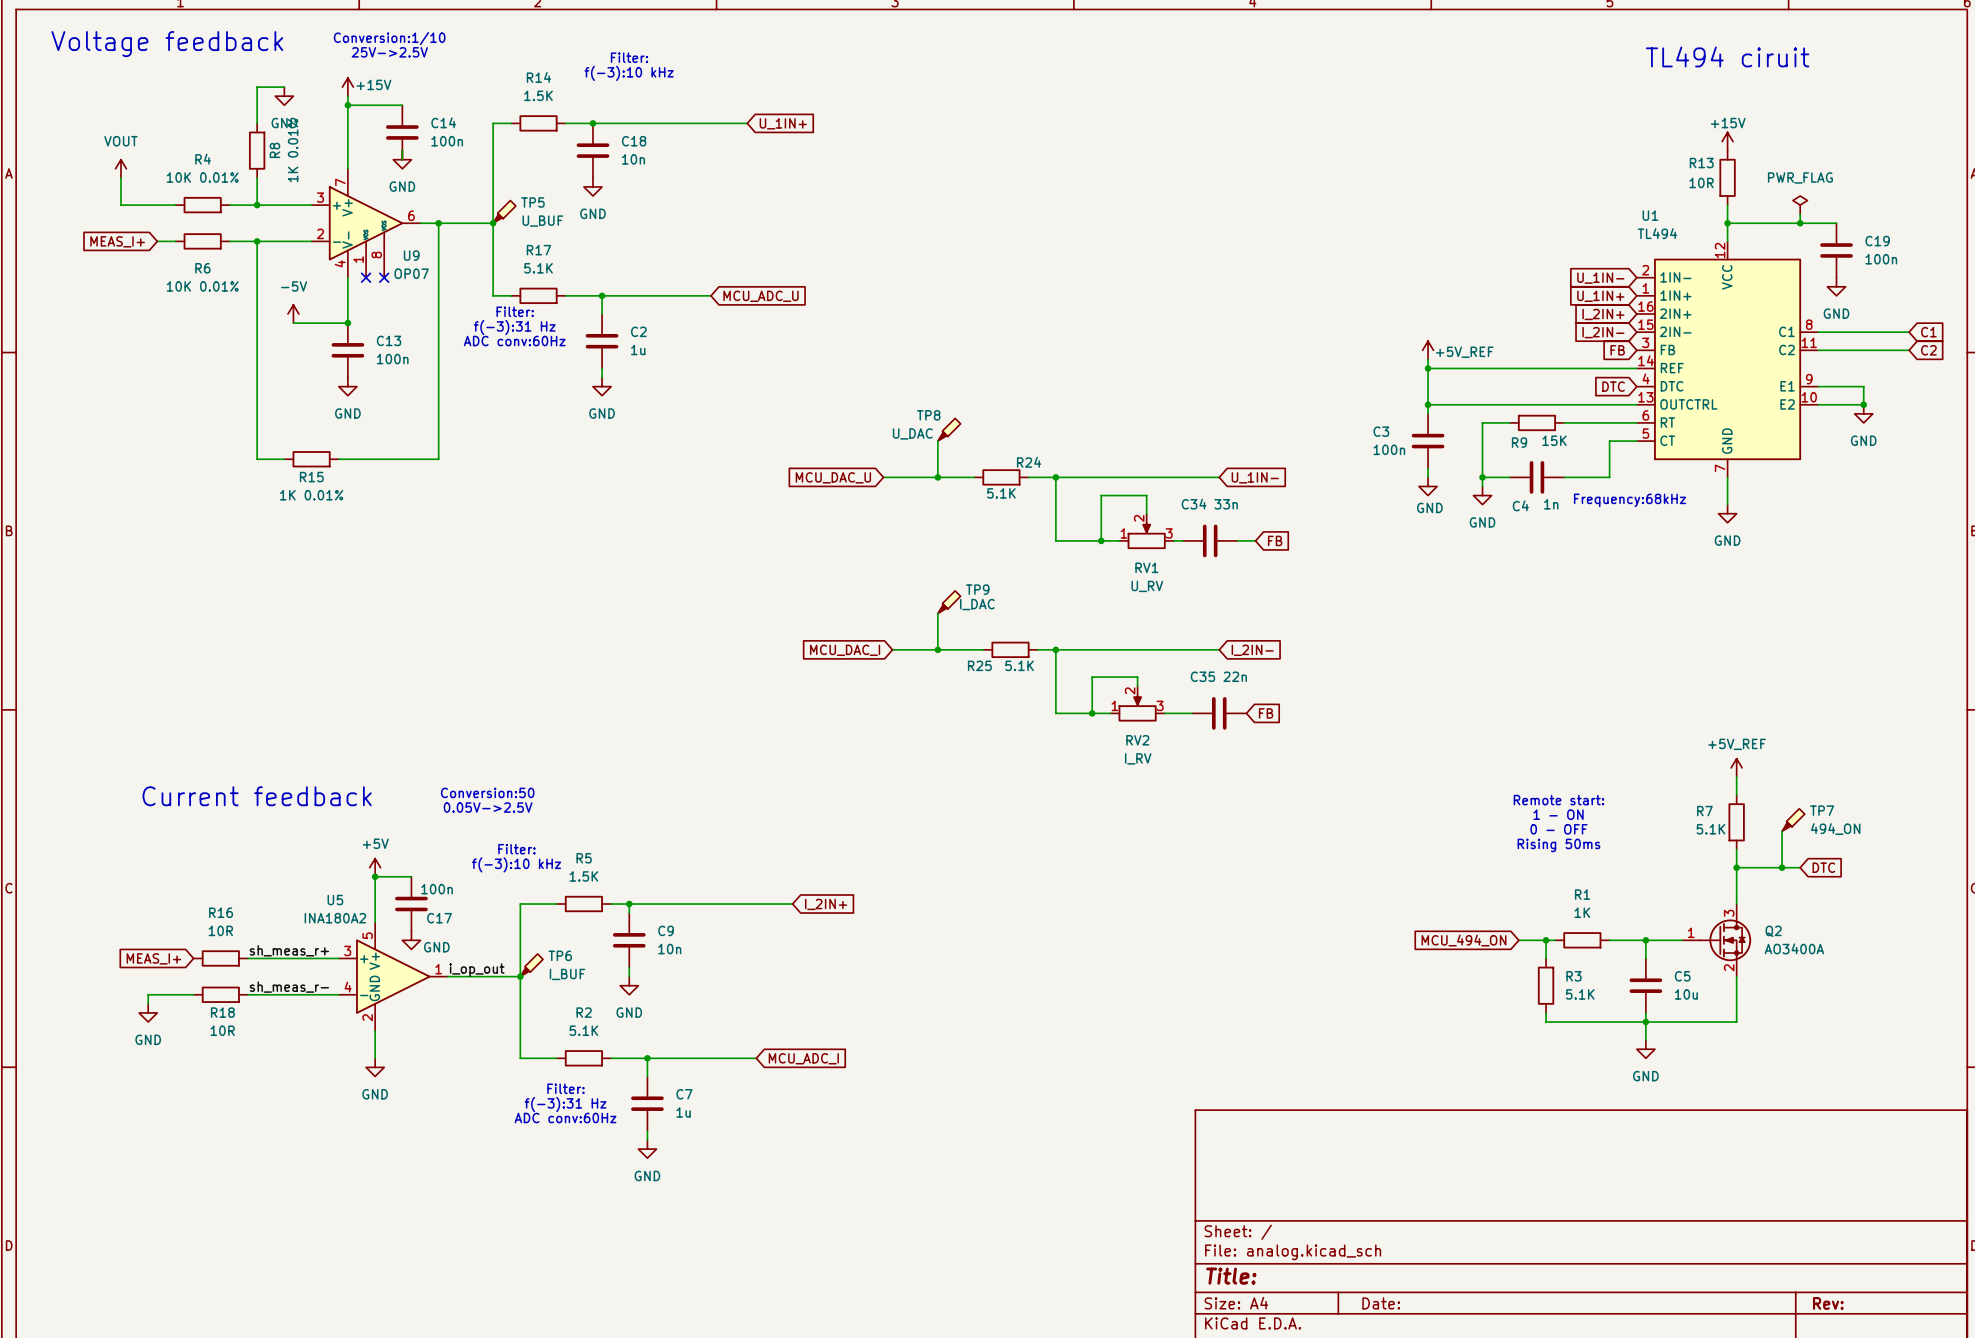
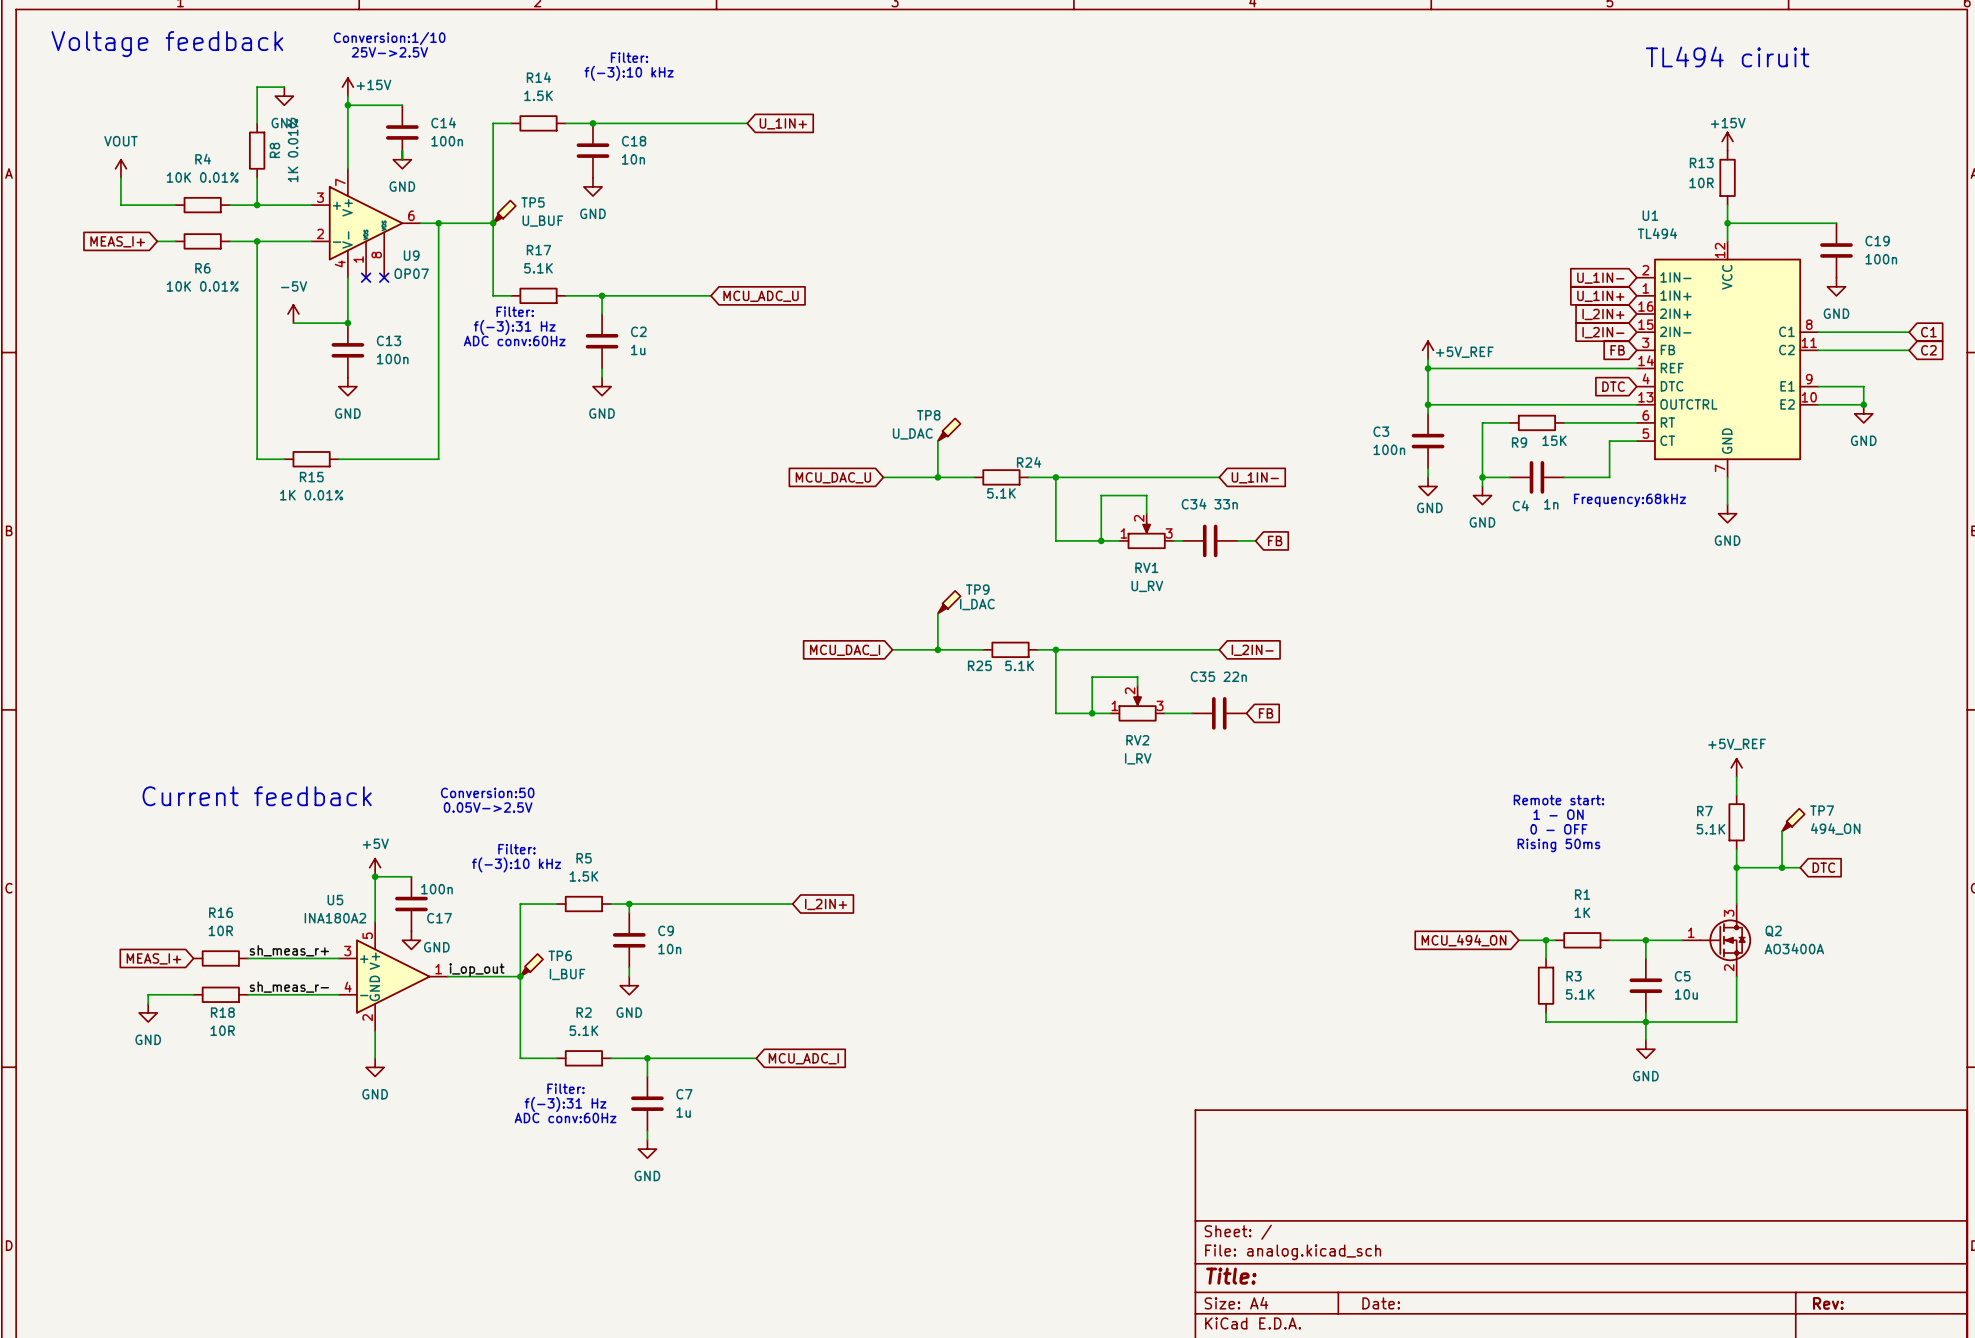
power symbol: PWR_FLAG (1800, 205) -> none
wire: (1800, 214) (1800, 223) -> none
junction: (1800, 223) -> none

